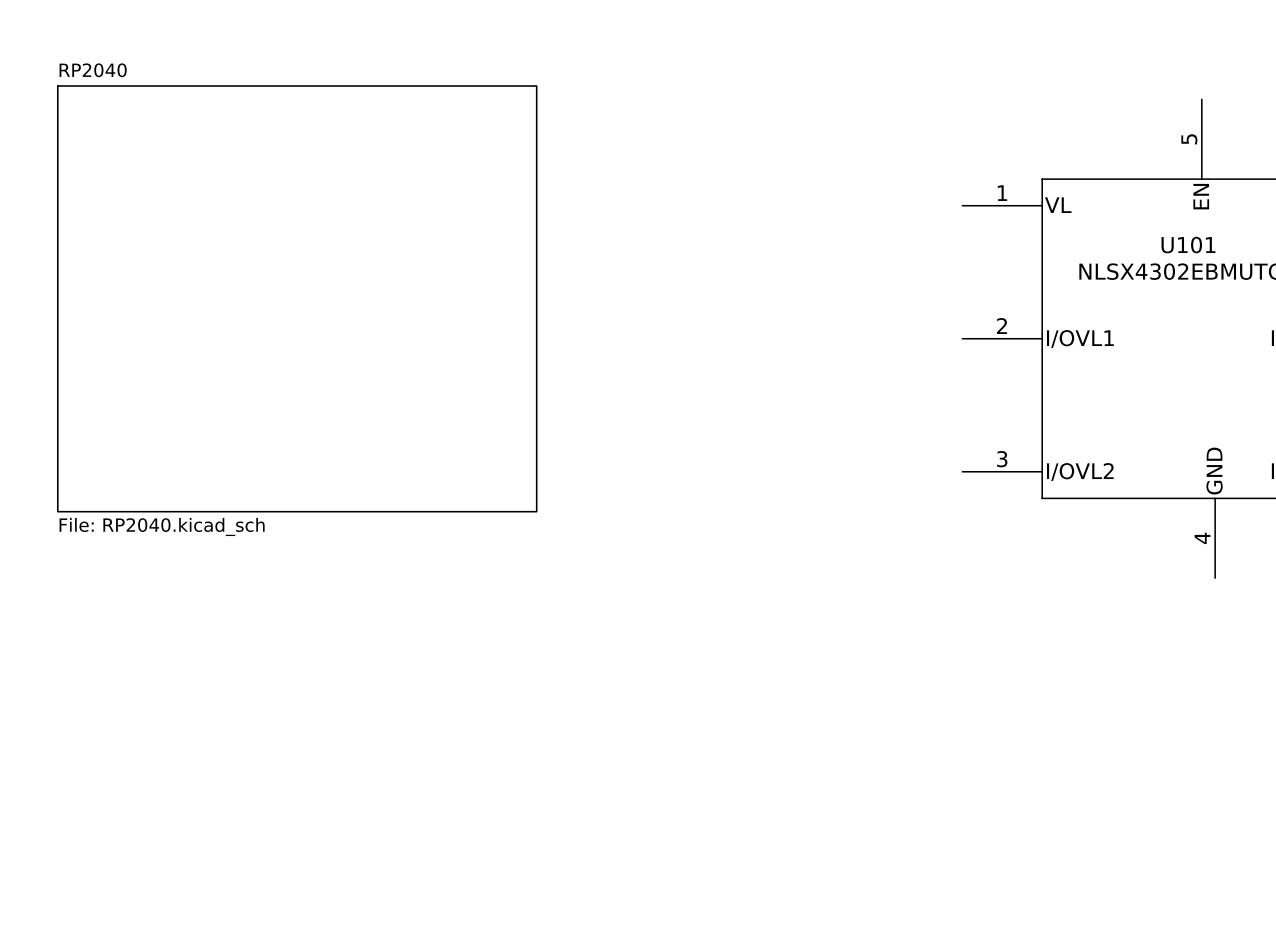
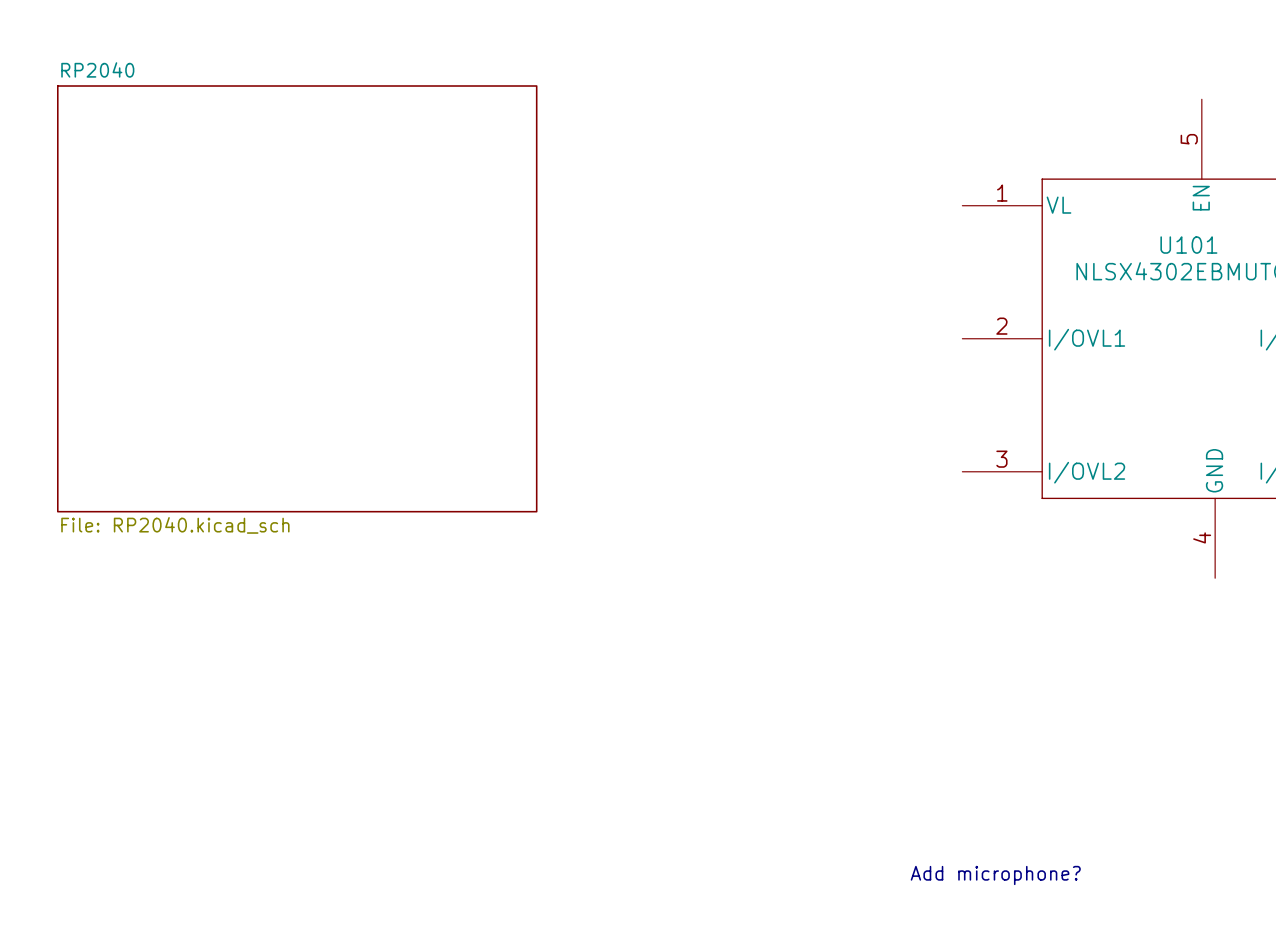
text: none -> Add microphone? (995, 875)

